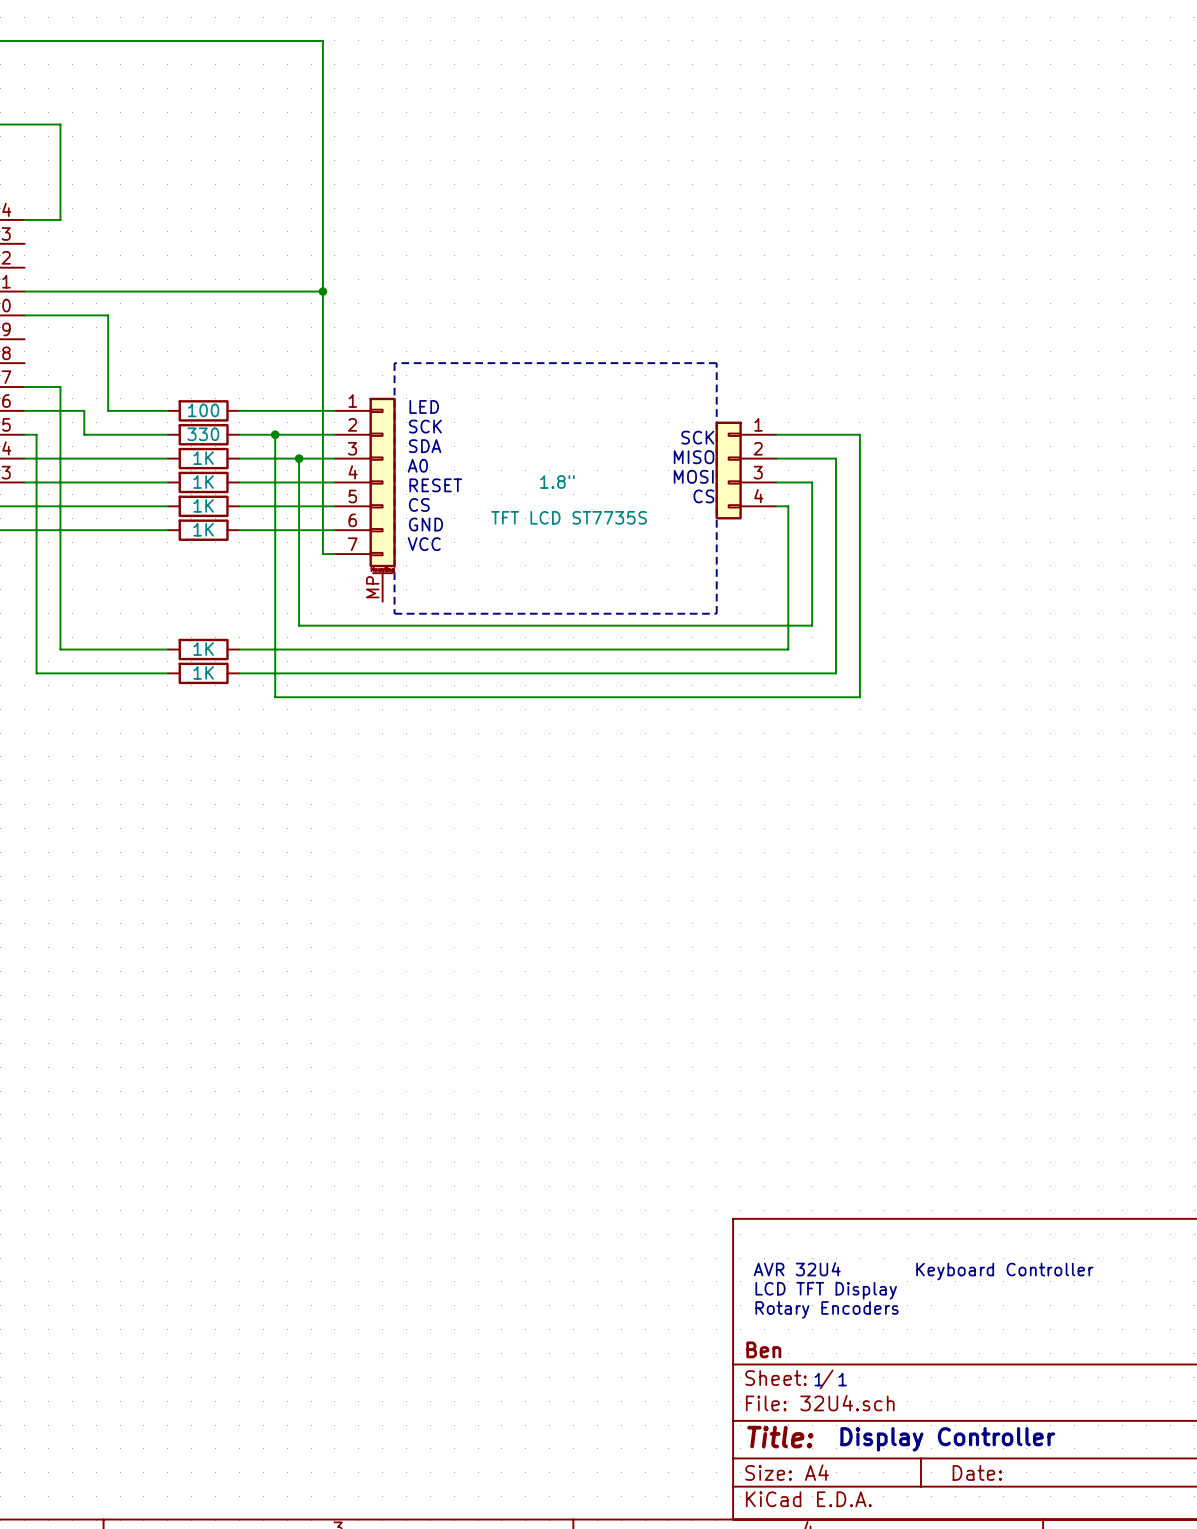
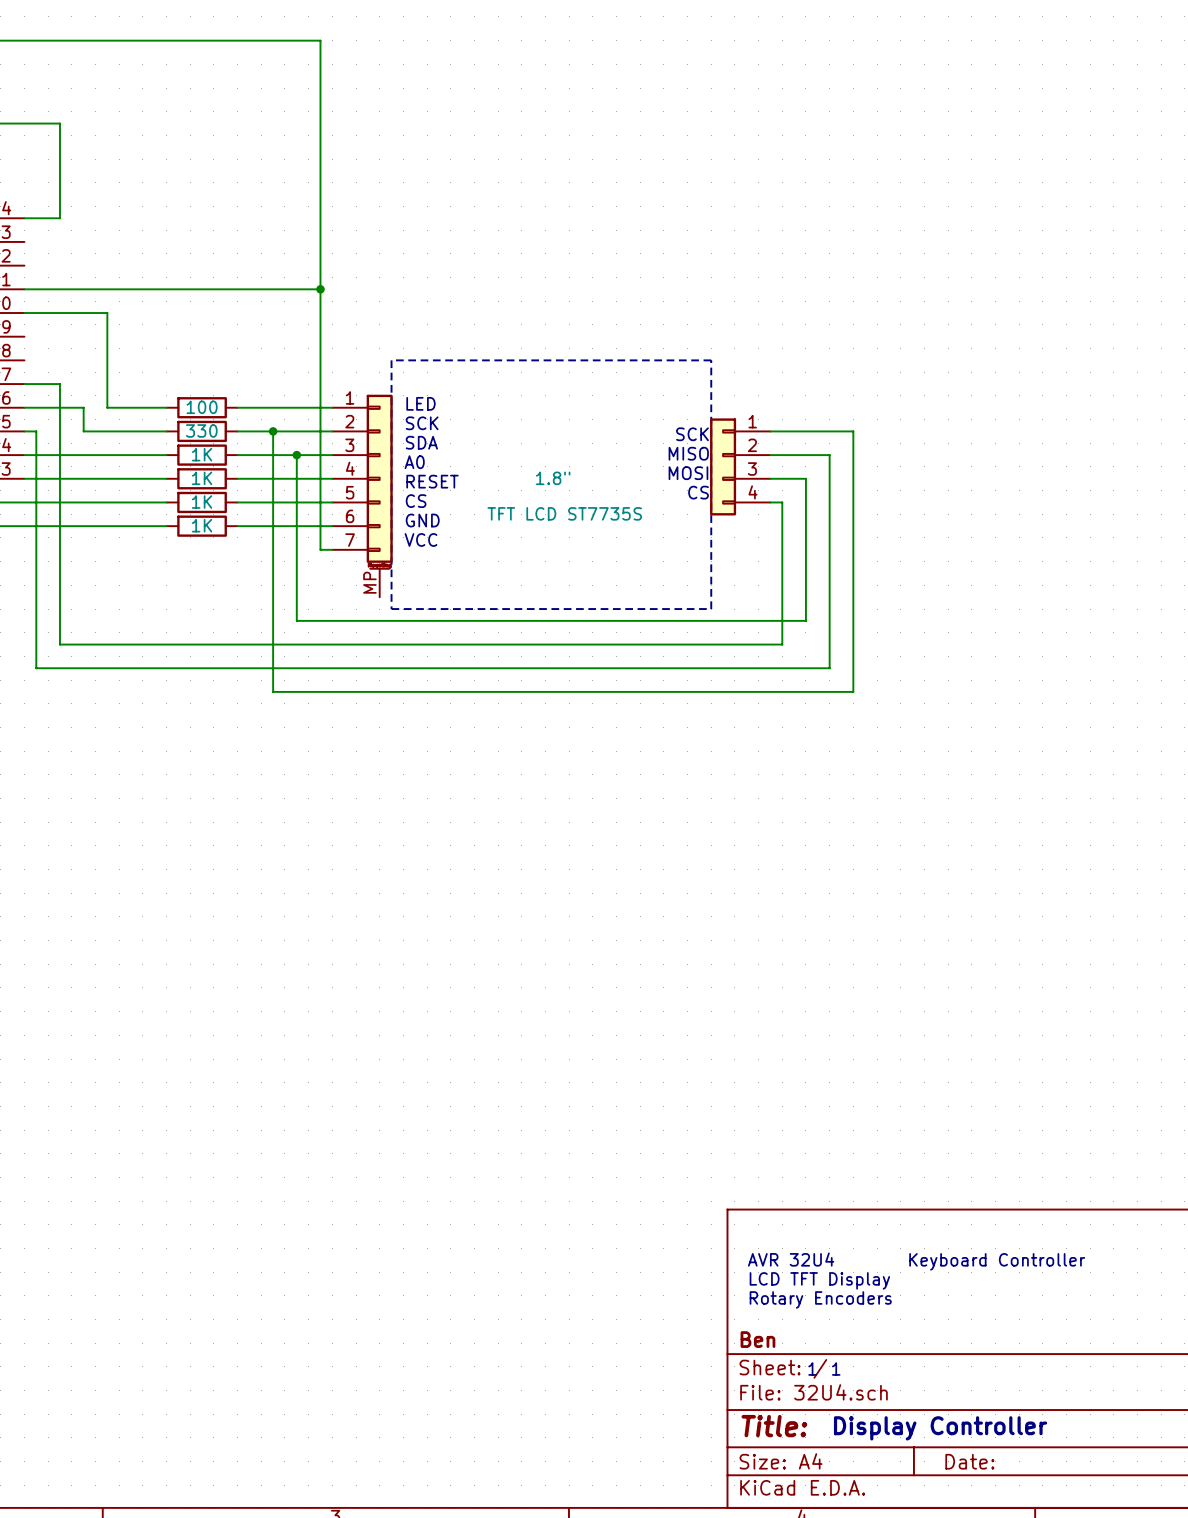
wire: none -> (166, 644) (237, 644)
part: 1K (203, 649) -> none
wire: none -> (166, 668) (237, 668)
part: 1K (203, 673) -> none

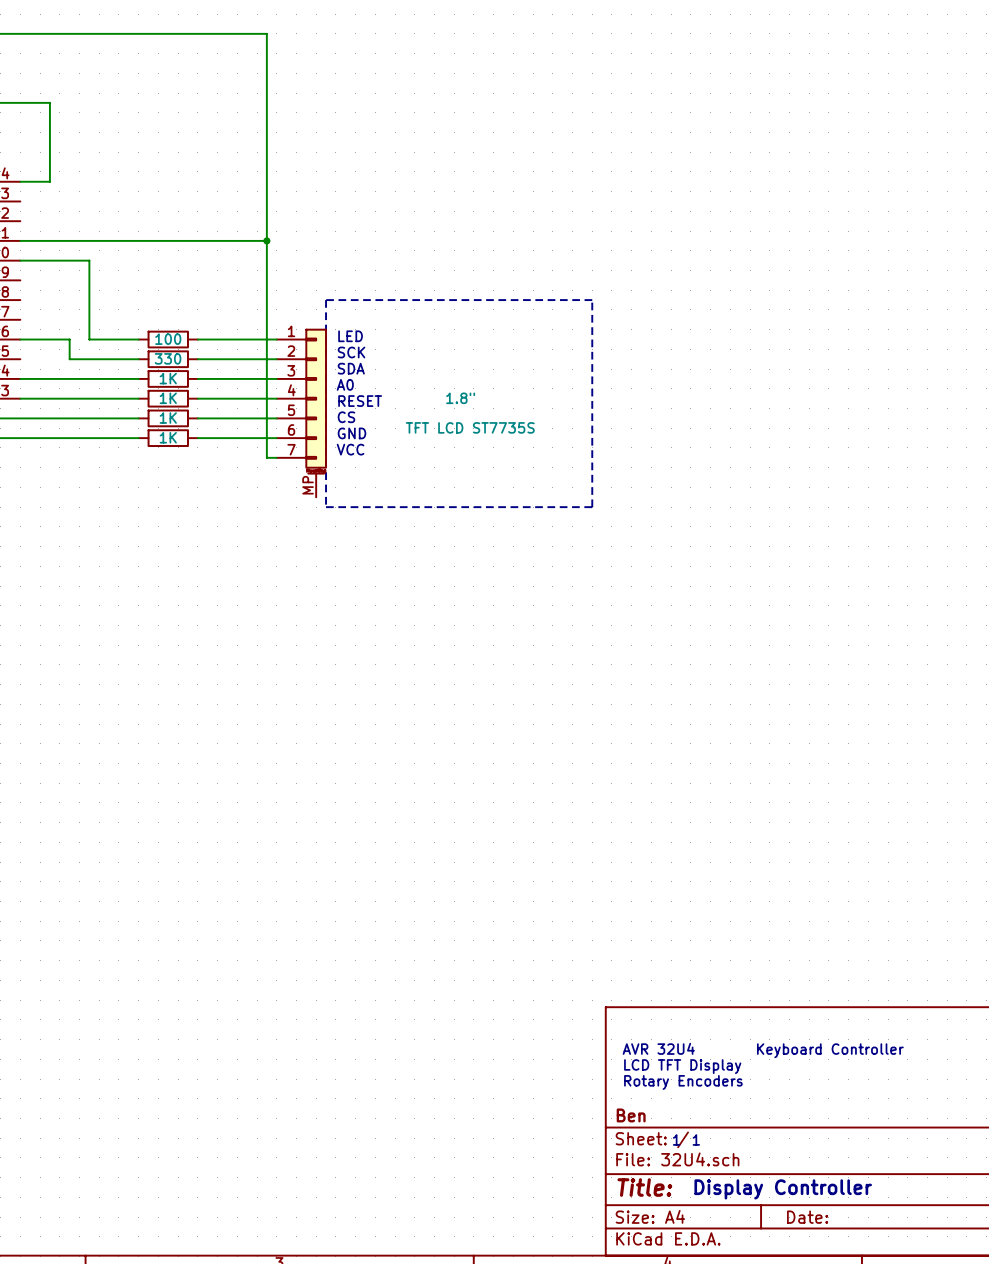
wire: (24, 384) (59, 384) (59, 644) (782, 644) (782, 502) (770, 502) -> none
wire: (24, 431) (36, 431) (36, 668) (829, 668) (829, 455) (770, 455) -> none
wire: (273, 431) (273, 691) (853, 691) (853, 431) (770, 431) -> none
junction: (273, 431) -> none
text: SCK (692, 434) -> none
text: MISO (688, 453) -> none
wire: (296, 455) (296, 620) (805, 620) (805, 478) (770, 478) -> none
junction: (296, 455) -> none
part: (740, 466) -> none
text: MOSI (688, 473) -> none
text: CS (698, 492) -> none

